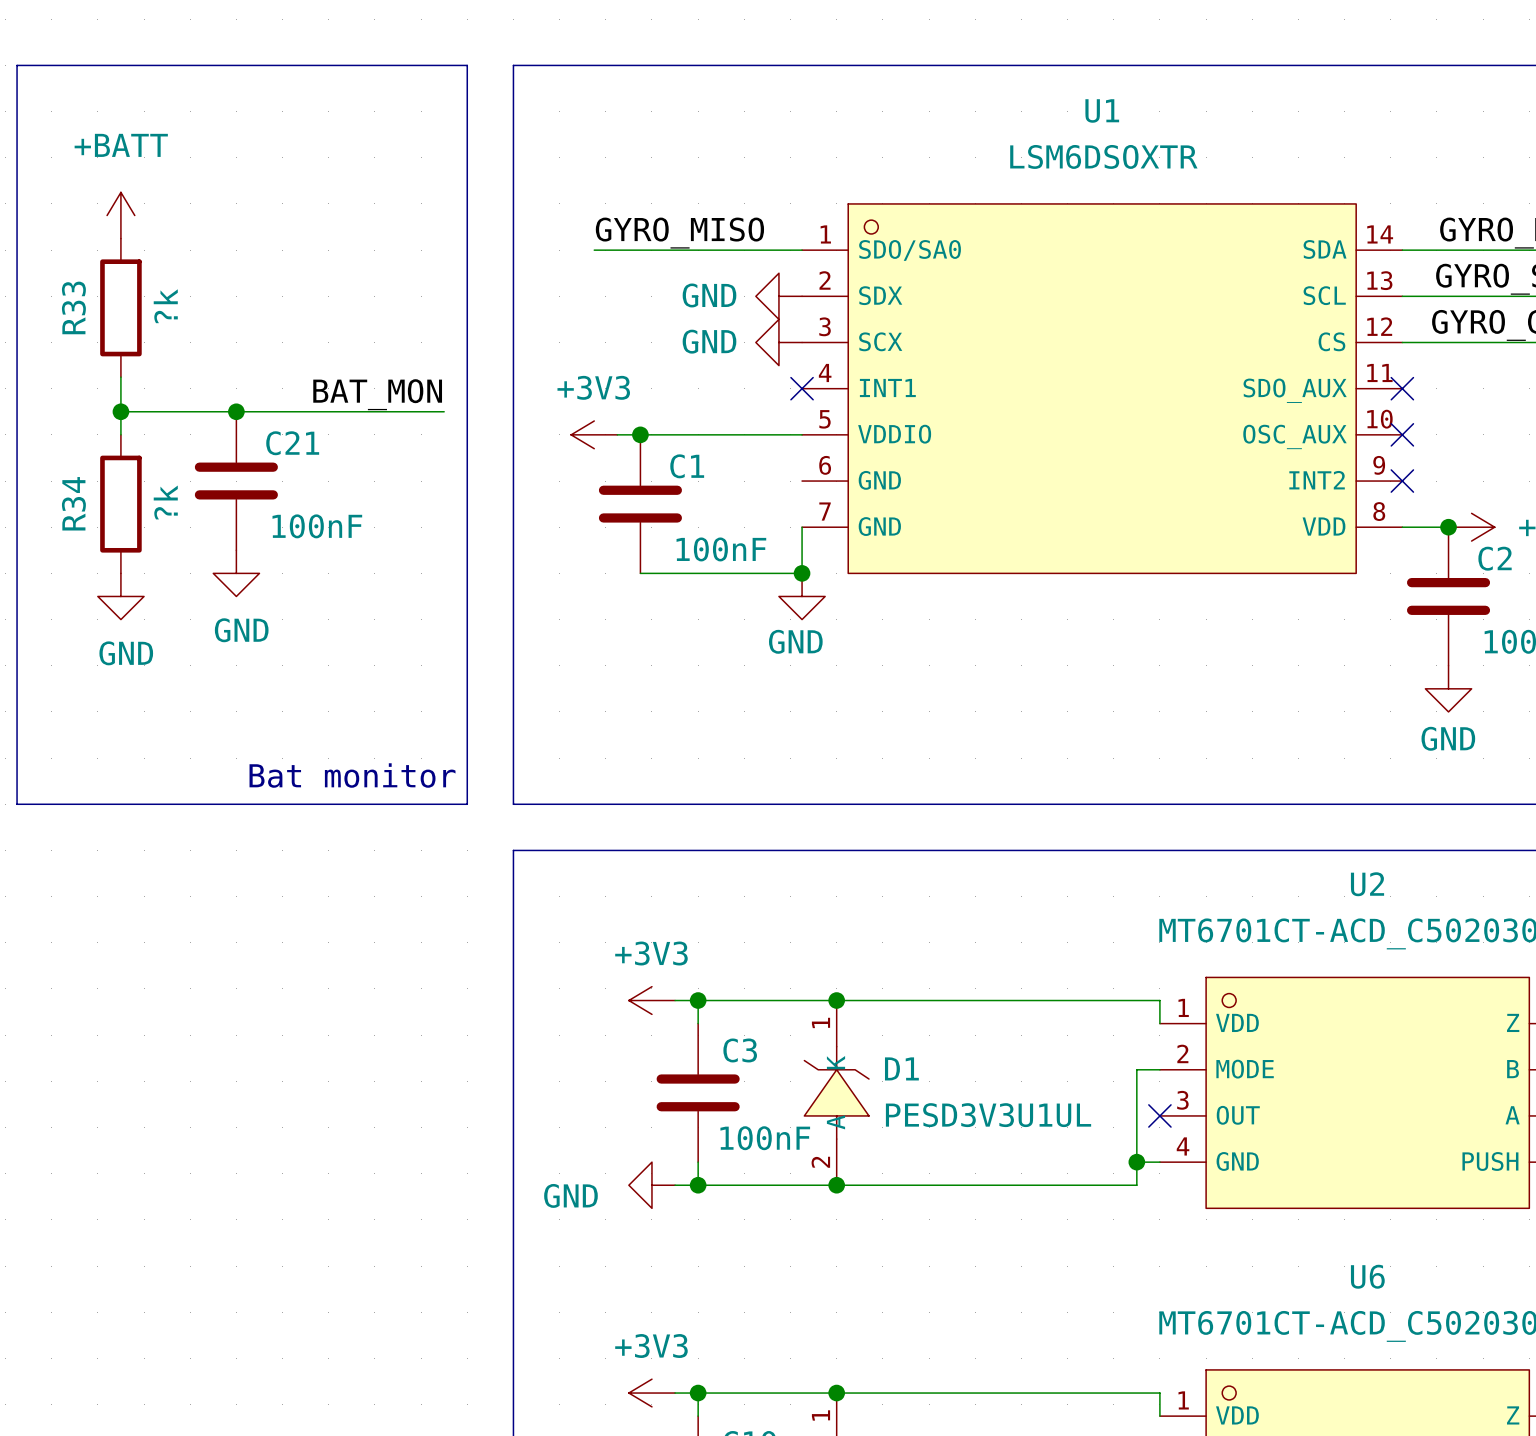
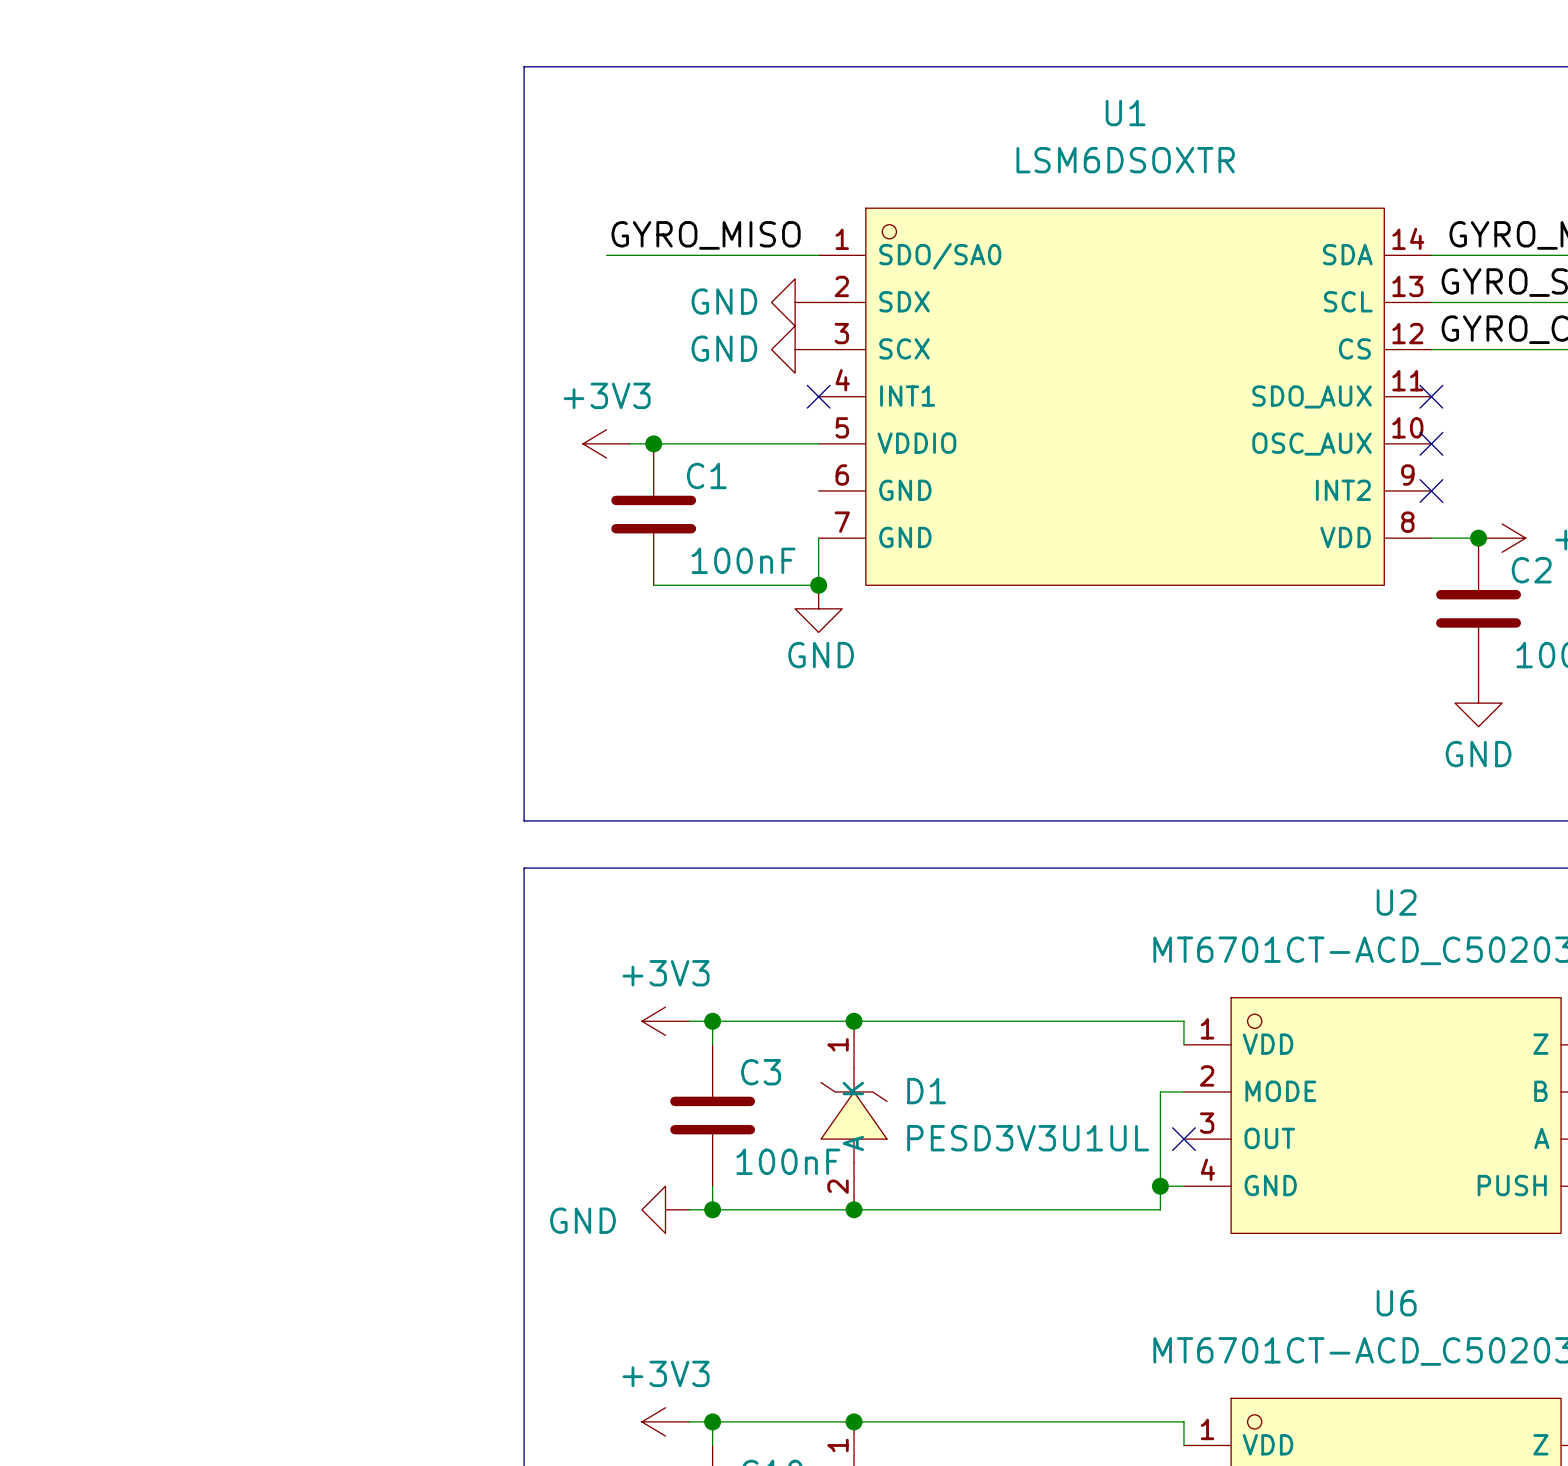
line: (17, 65) (467, 65) (467, 804) (17, 804) (17, 65) -> none
power symbol: +BATT (120, 215) -> none
R33: ?k (120, 307) -> none
wire: (120, 377) (120, 434) -> none
label: BAT_MON (377, 394) -> none
wire: (120, 411) (444, 411) -> none
junction: (120, 411) -> none
junction: (236, 411) -> none
C21: 100nF (236, 481) -> none
R34: ?k (120, 504) -> none
power symbol: GND (236, 573) -> none
power symbol: GND (120, 596) -> none
text: Bat monitor (352, 775) -> none

